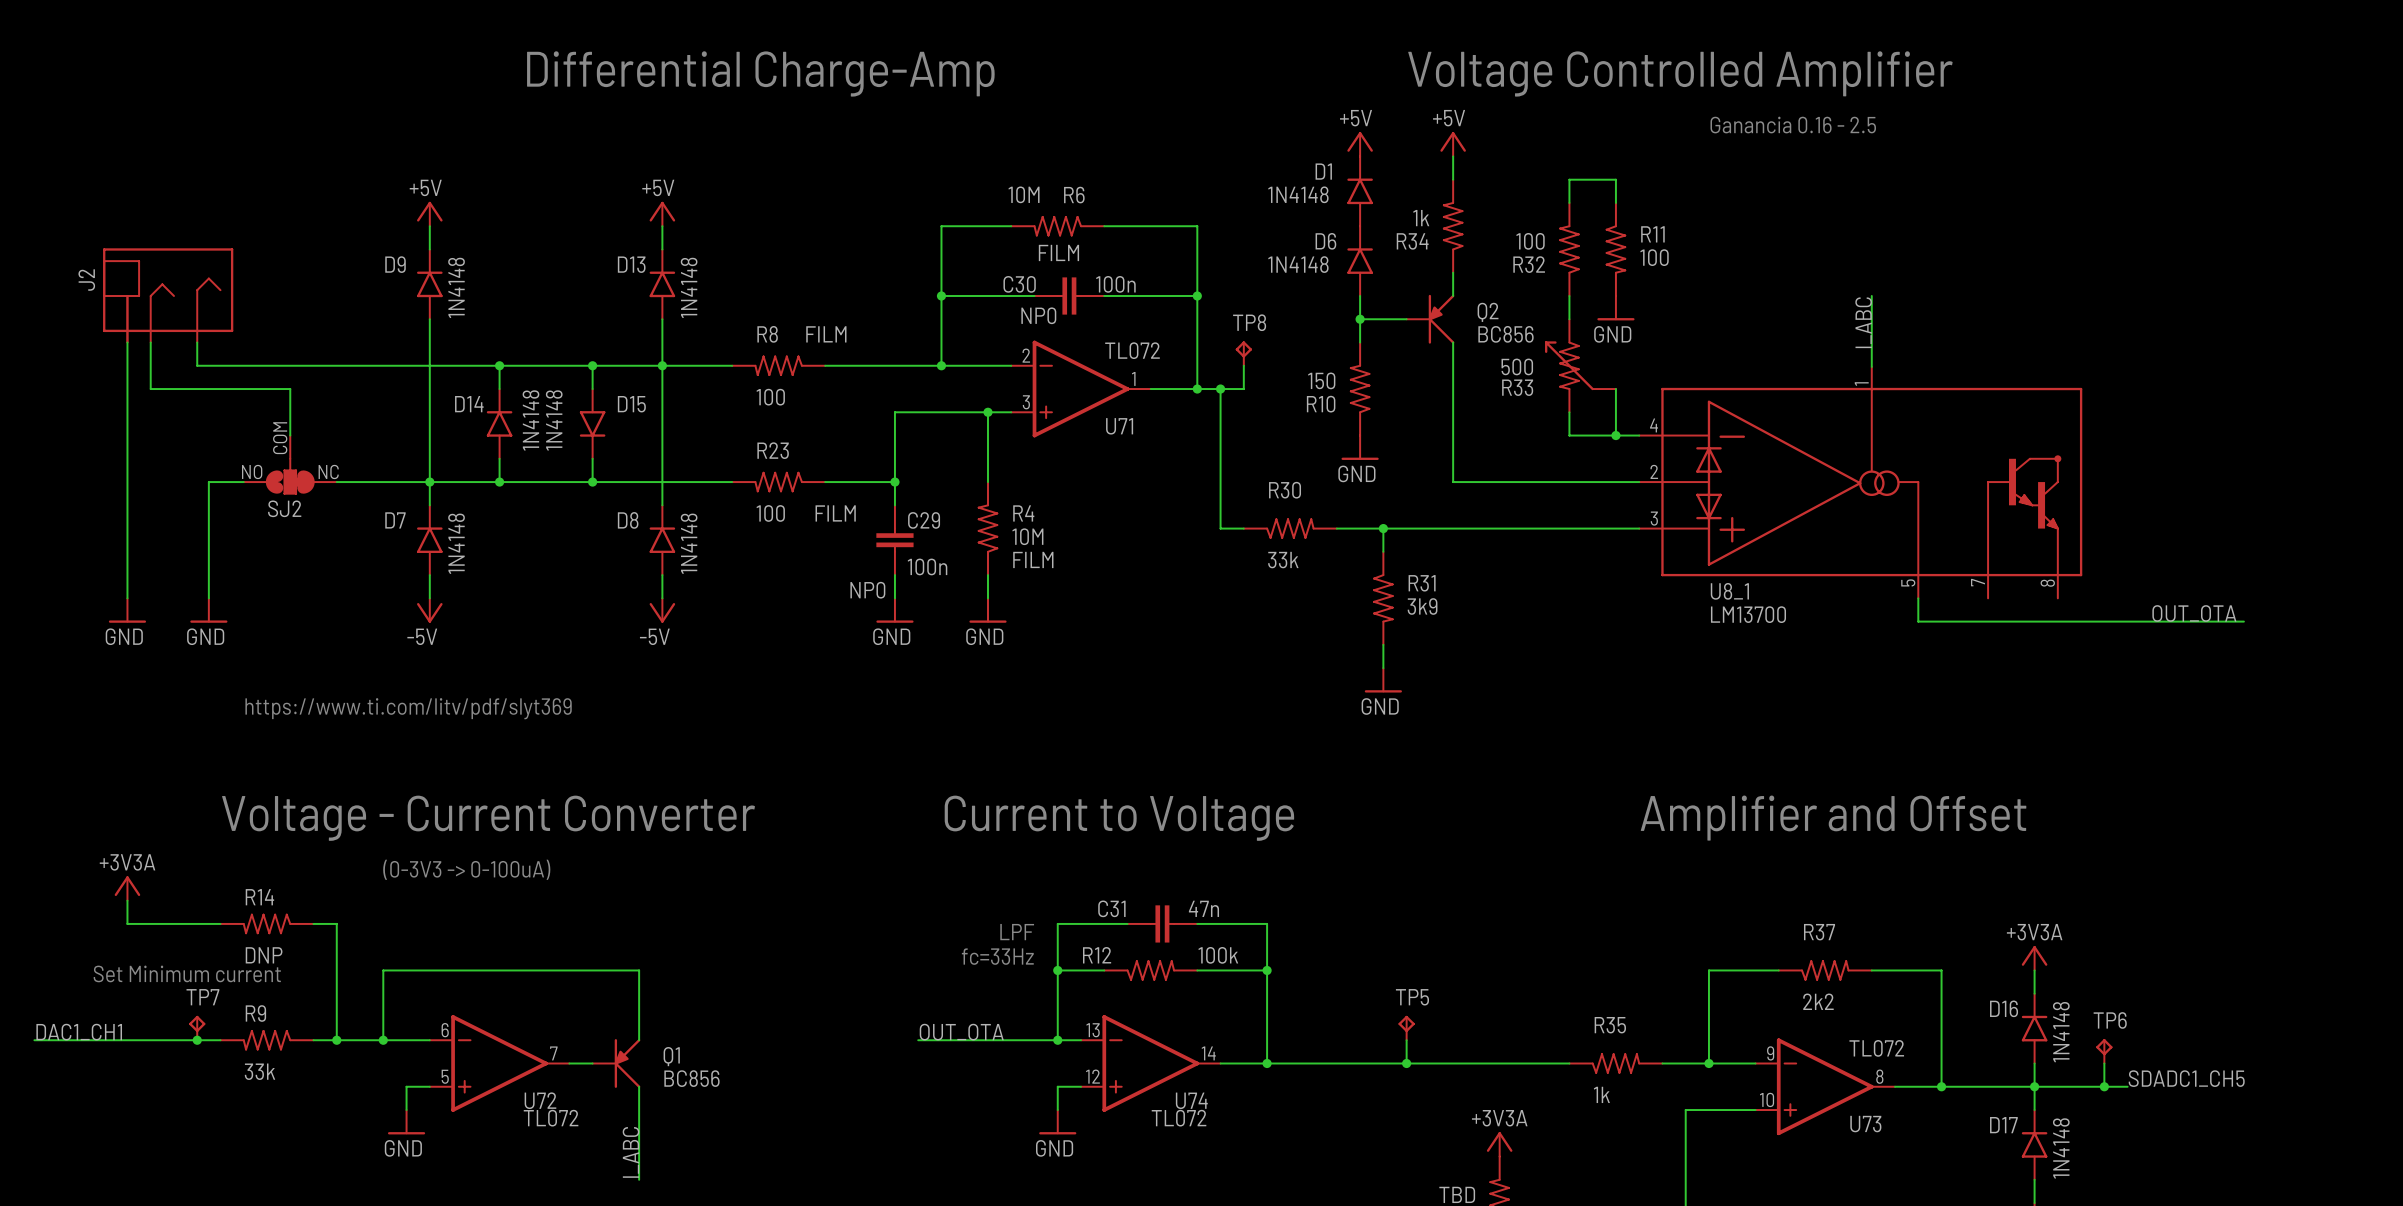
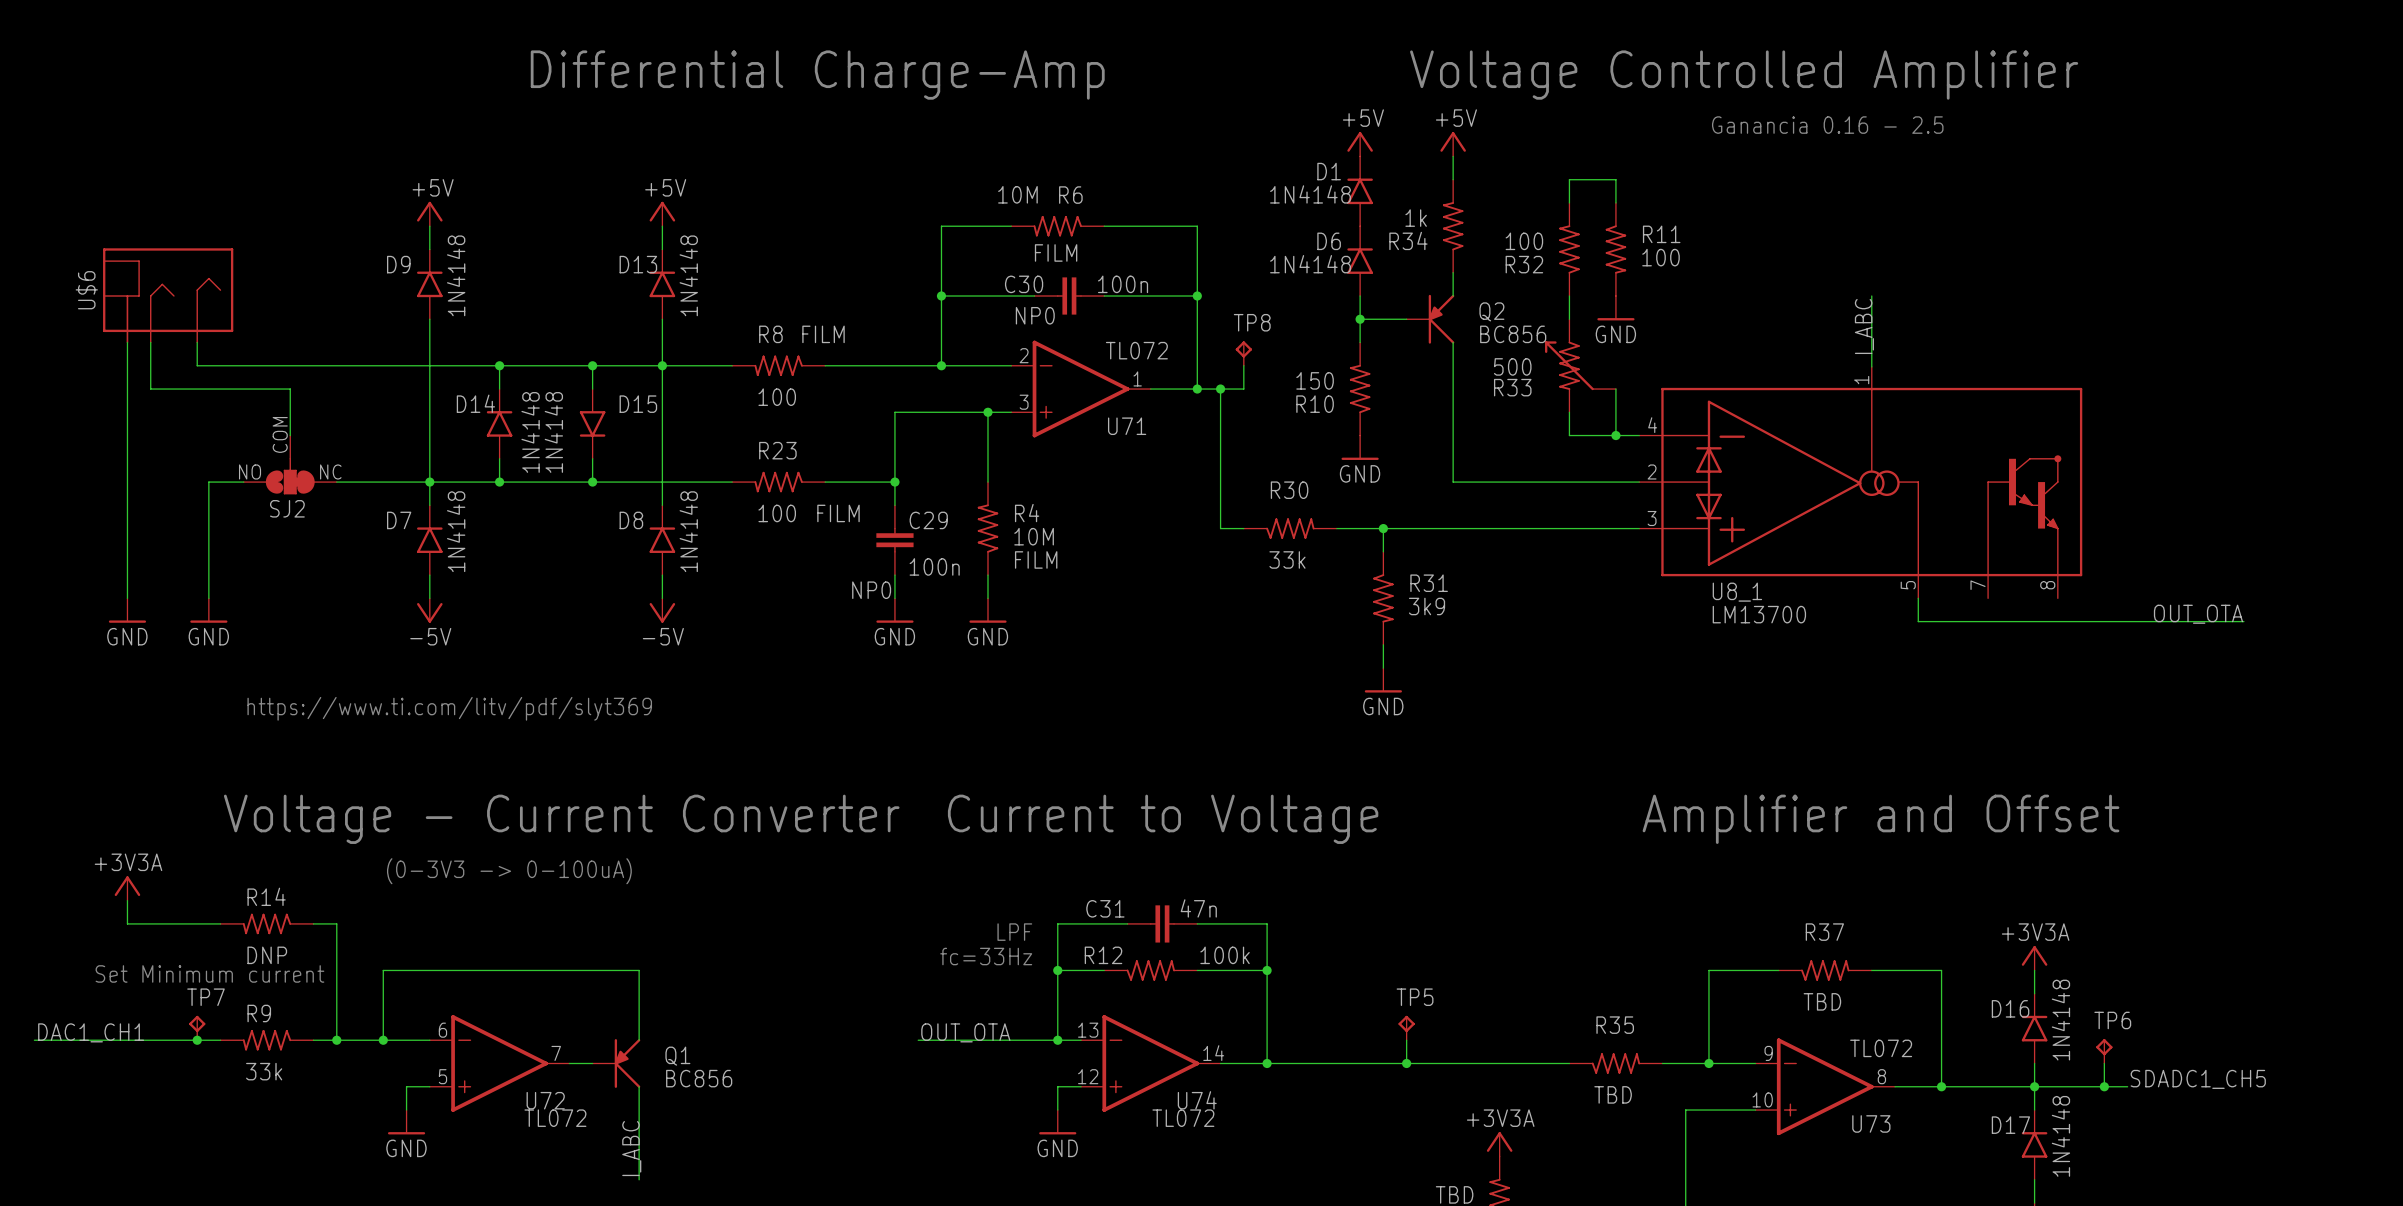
J2 name: J2 (86, 280) -> U$6 (86, 290)
R37 value: 2k2 (1818, 1001) -> TBD (1822, 1001)
R35 value: 1k (1601, 1094) -> TBD (1613, 1094)

